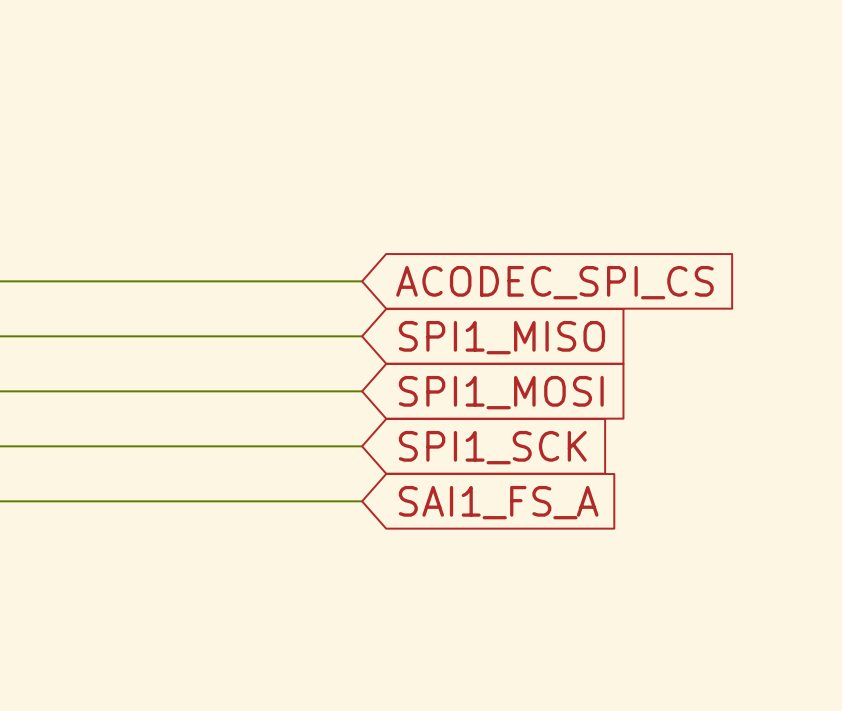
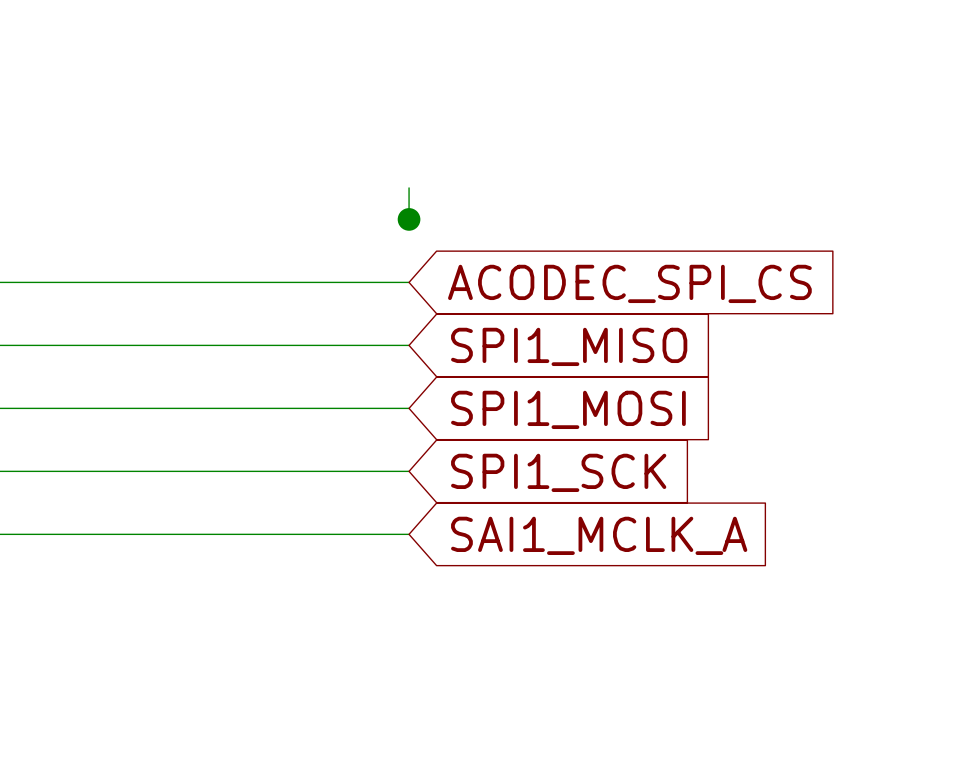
wire: none -> (409, 187) (409, 219)
junction: none -> (409, 219)
global label: SAI1_FS_A (498, 502) -> SAI1_MCLK_A (599, 535)

